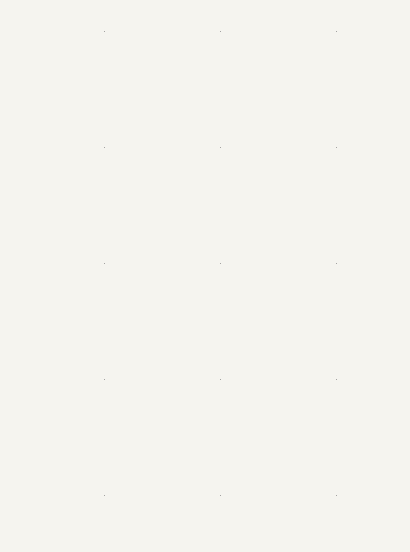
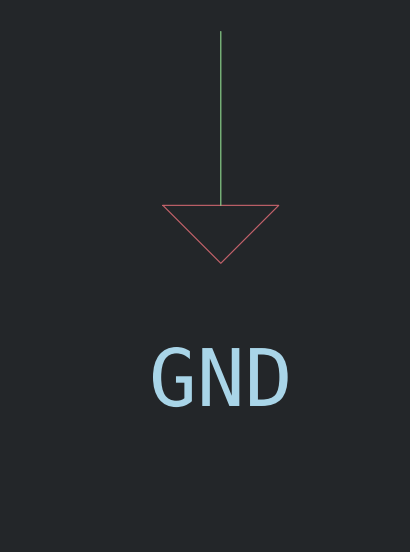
wire: none -> (220, 31) (220, 205)
power symbol: none -> GND (220, 234)

